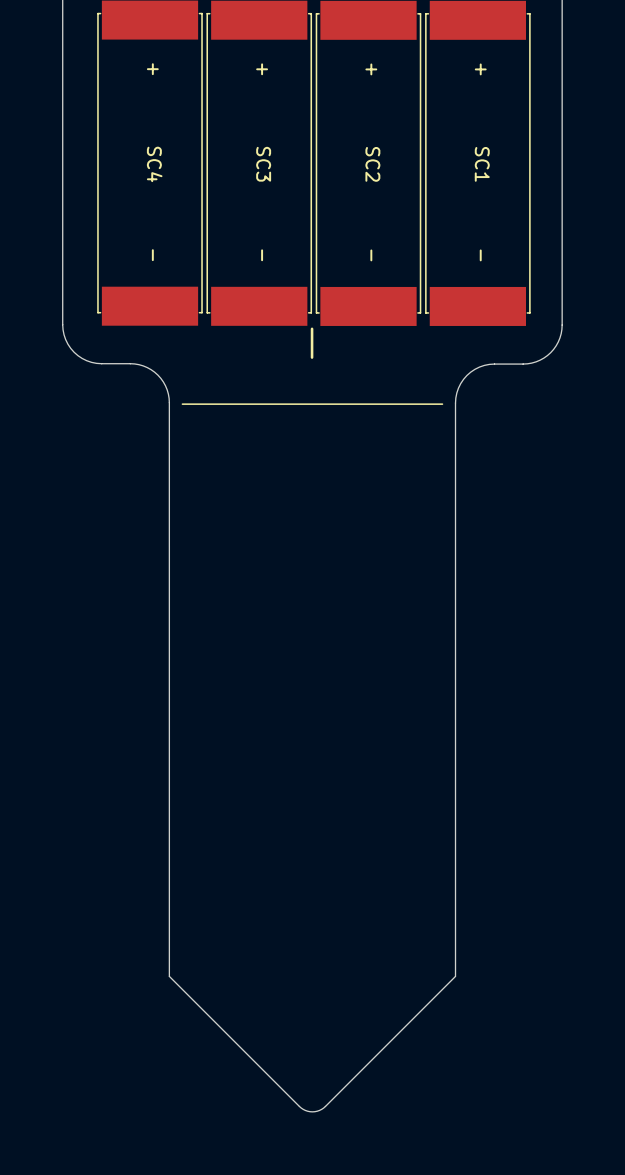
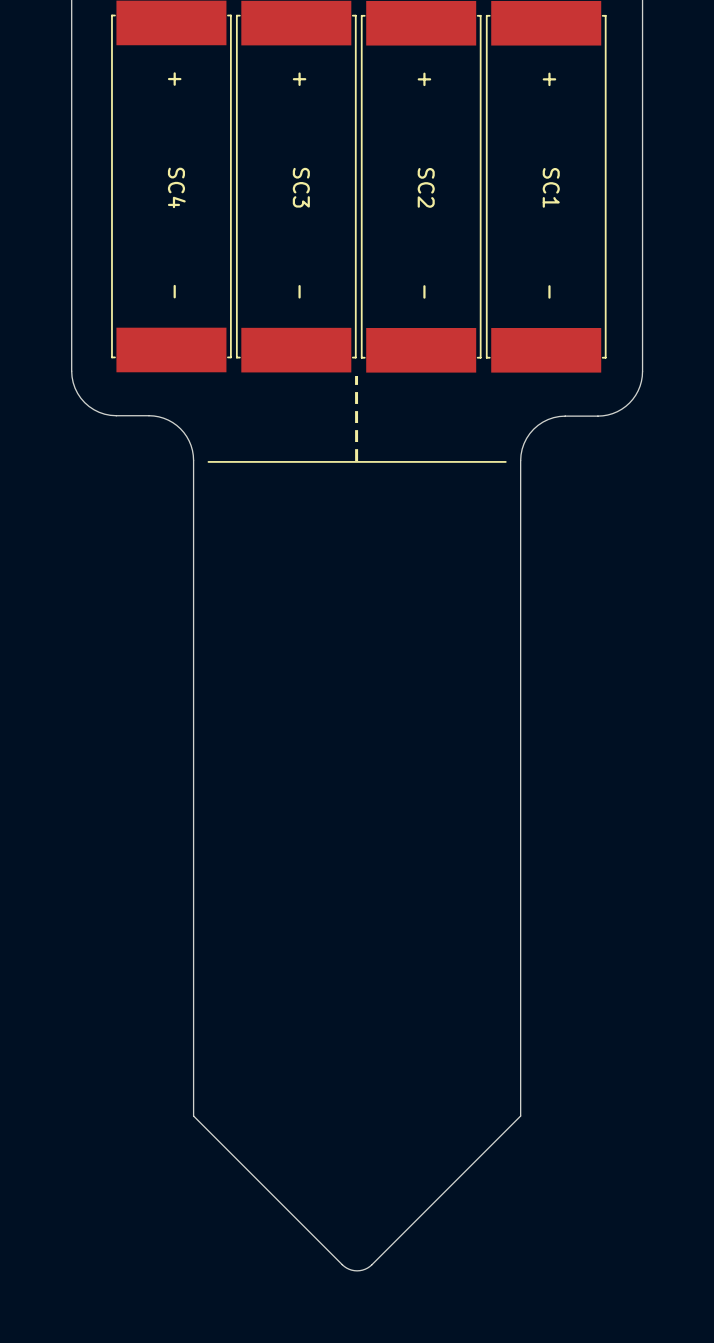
line: (312, 328) (312, 357) -> (356, 376) (356, 461)

